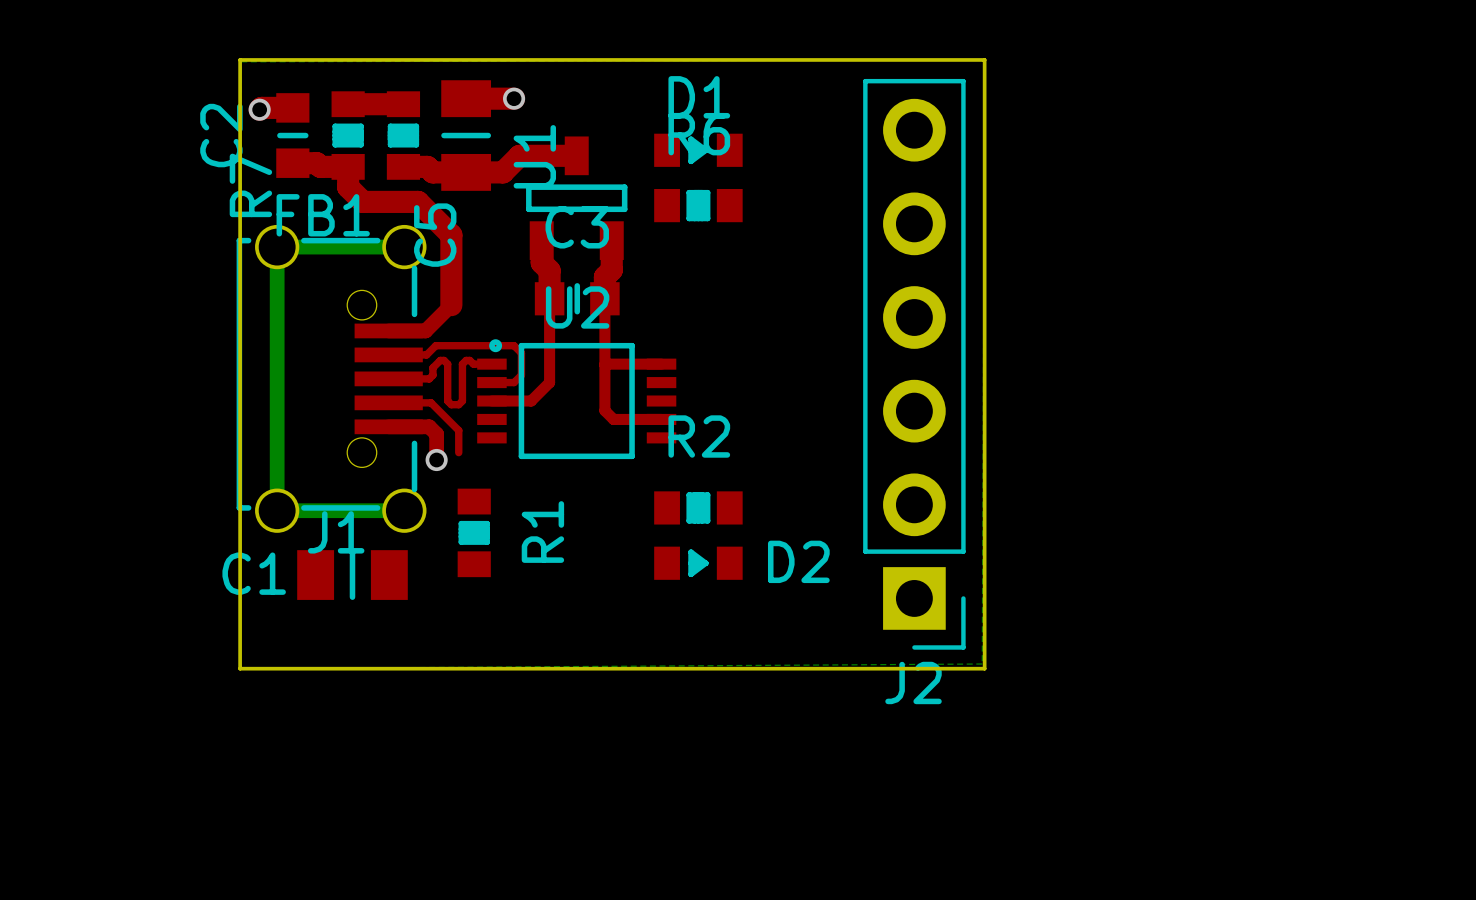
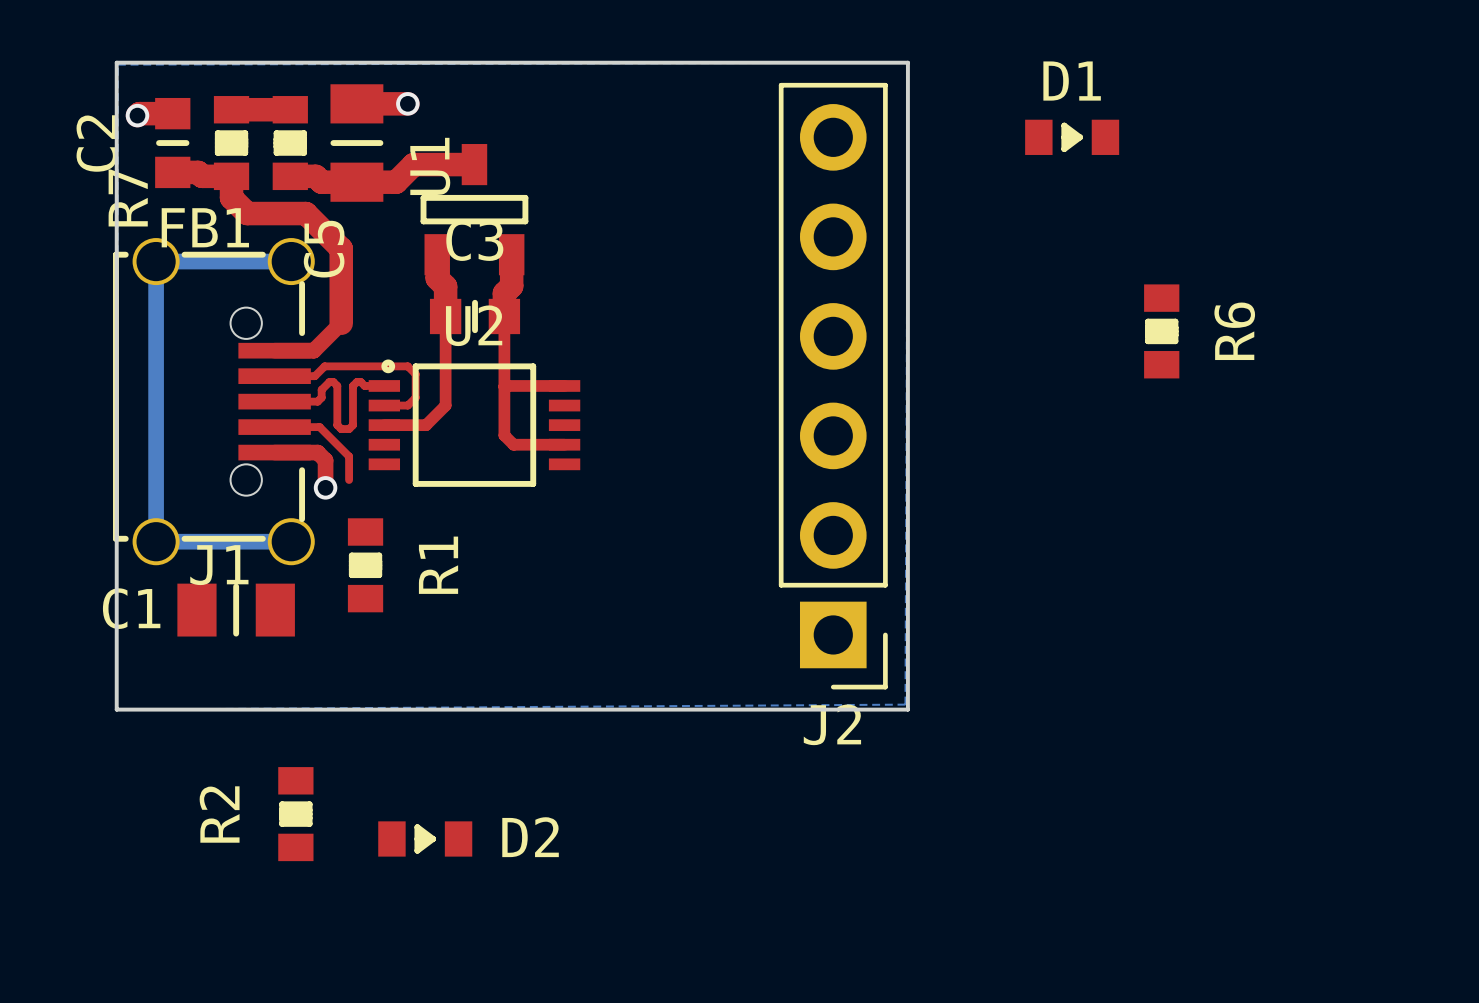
D1 position: (698, 150) -> (1072, 137)
R6 rotation: 0° (698, 205) -> 90° clockwise (1161, 331)
R6 position: (698, 205) -> (1161, 331)
R2 name position: R2 (699, 436) -> R2 (219, 814)
R2 rotation: 0° (698, 507) -> 90° clockwise (295, 814)
R2 position: (698, 507) -> (295, 814)
D2 position: (698, 563) -> (425, 838)

